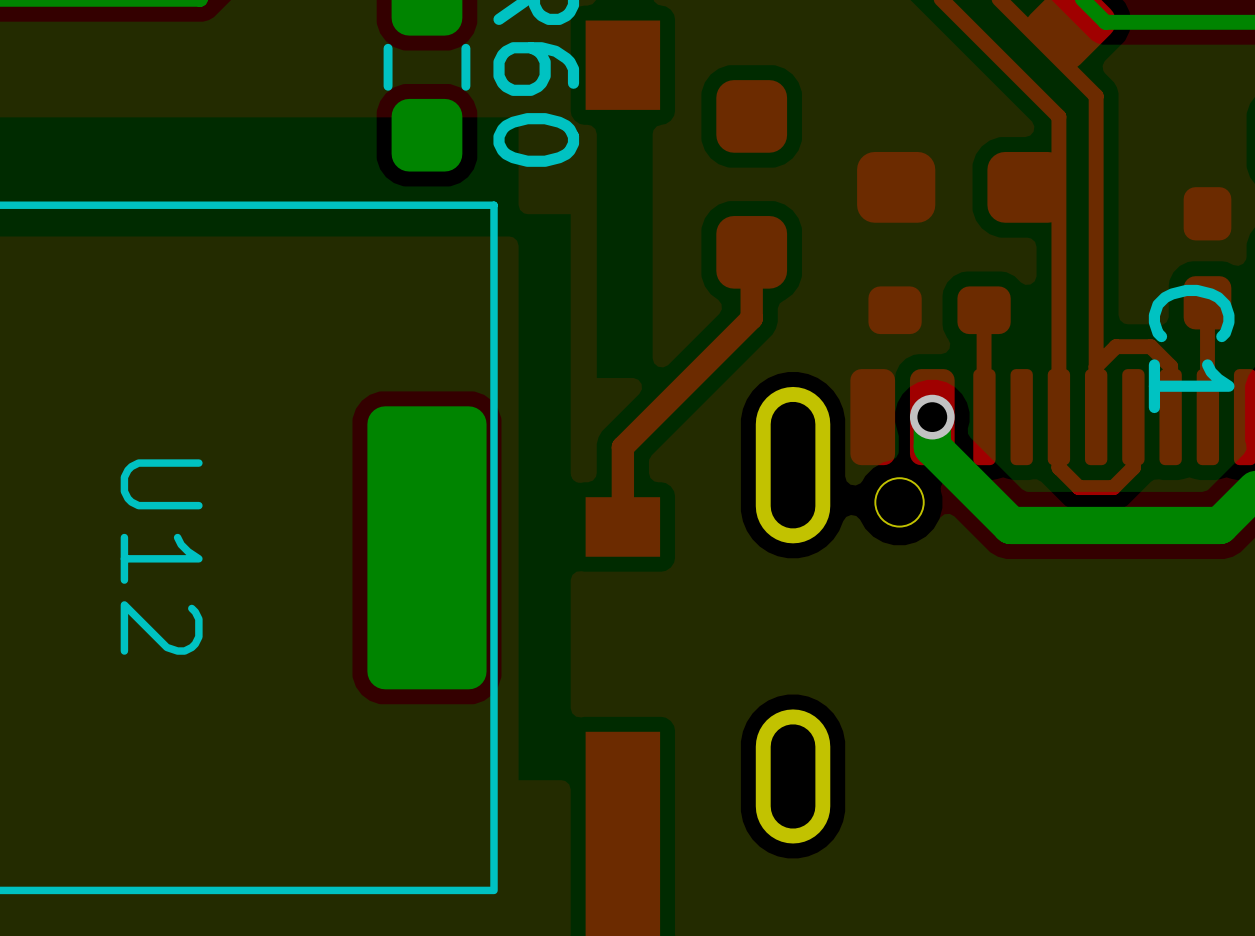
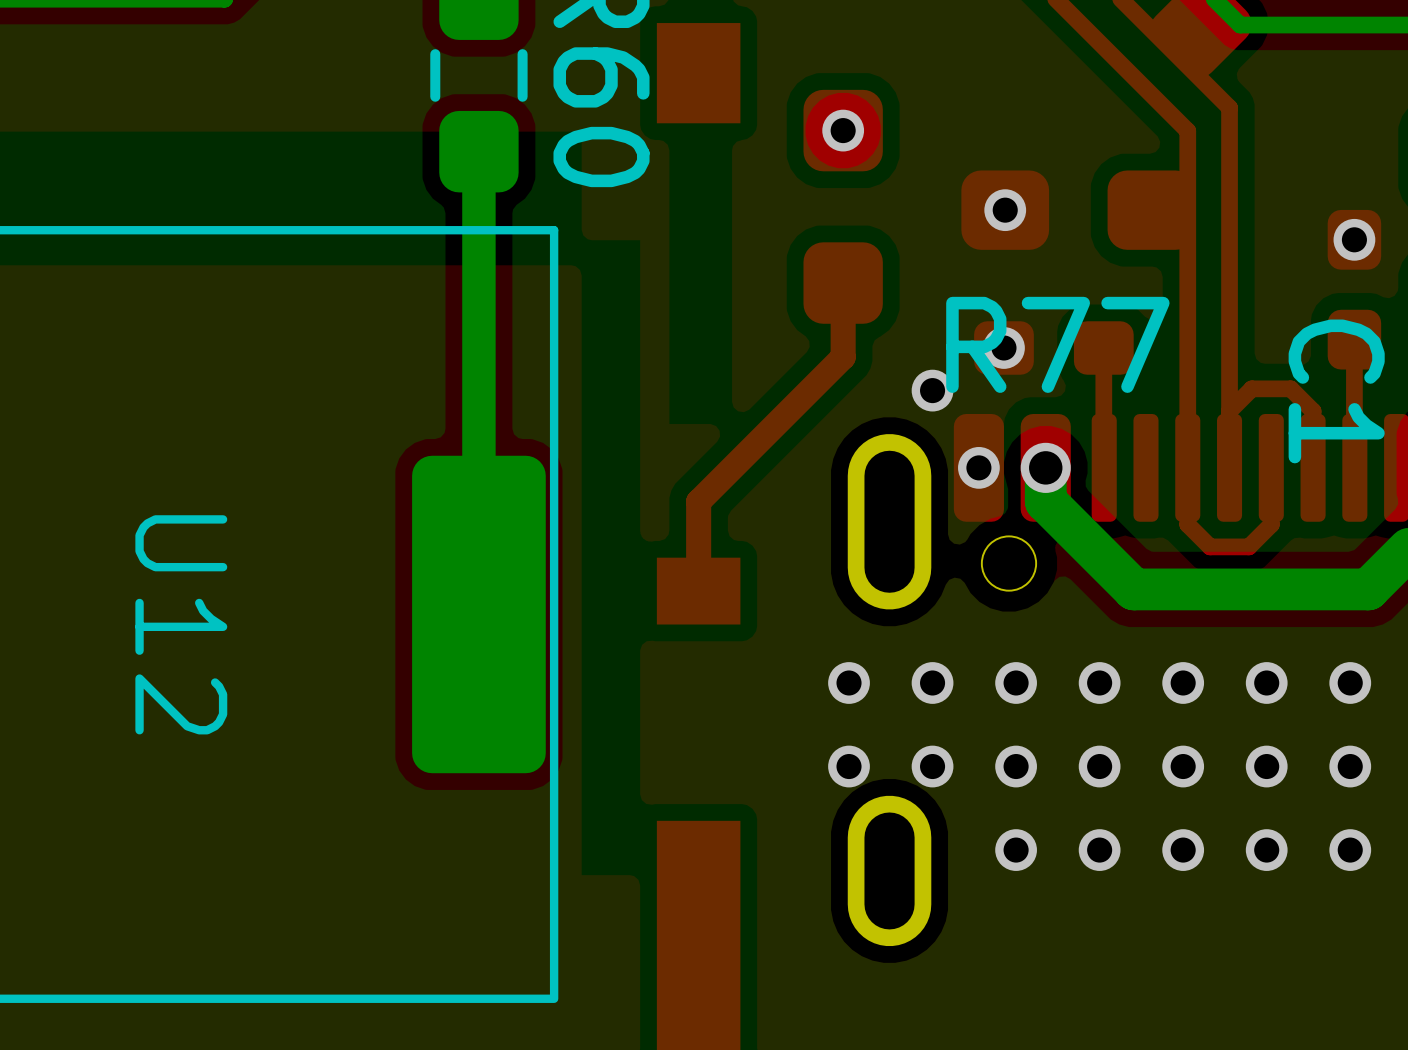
via: none -> (843, 130)
bottom track: none -> (478, 151) (478, 614)
via: none -> (1005, 210)
via: none -> (1354, 239)
R77 name: none -> R77 (1057, 344)
via: none -> (1003, 347)
via: none -> (932, 390)
via: none -> (978, 467)
via: none -> (849, 682)
via: none -> (932, 682)
via: none -> (1016, 682)
via: none -> (1099, 682)
via: none -> (1183, 682)
via: none -> (1266, 682)
via: none -> (1350, 682)
via: none -> (849, 766)
via: none -> (932, 766)
via: none -> (1016, 766)
via: none -> (1099, 766)
via: none -> (1183, 766)
via: none -> (1266, 766)
via: none -> (1350, 766)
via: none -> (1016, 850)
via: none -> (1099, 850)
via: none -> (1183, 850)
via: none -> (1266, 850)
via: none -> (1350, 850)

